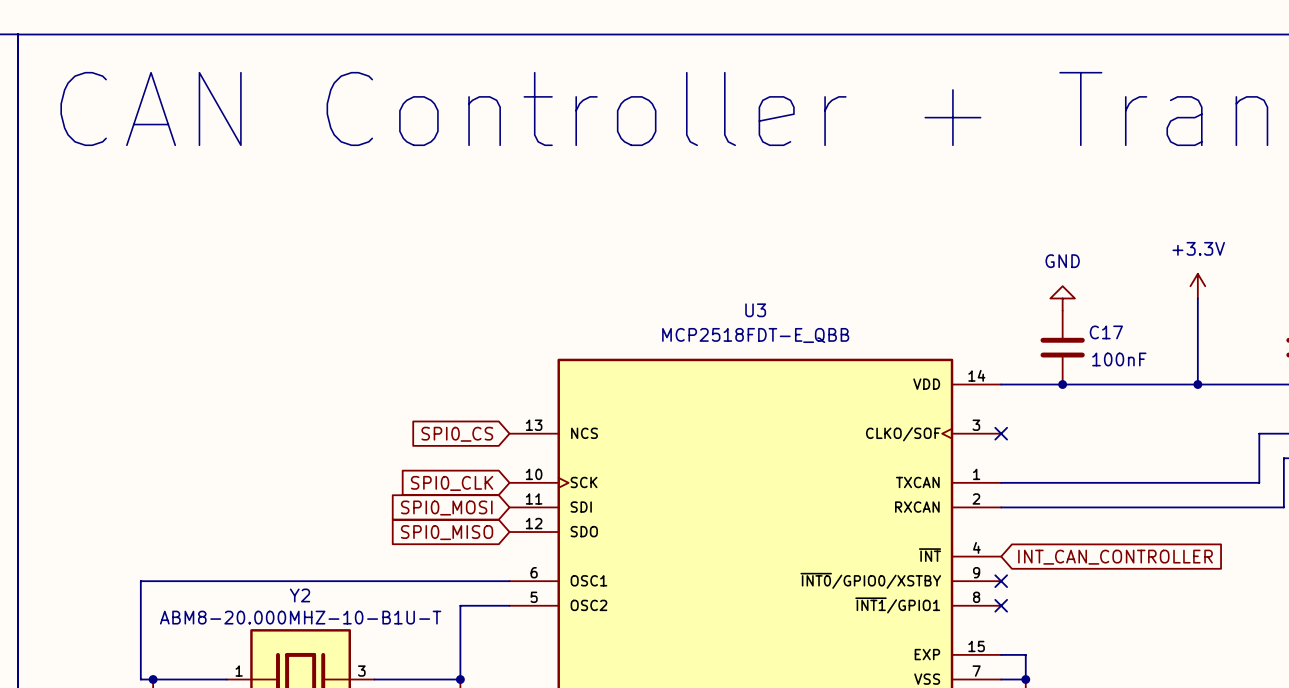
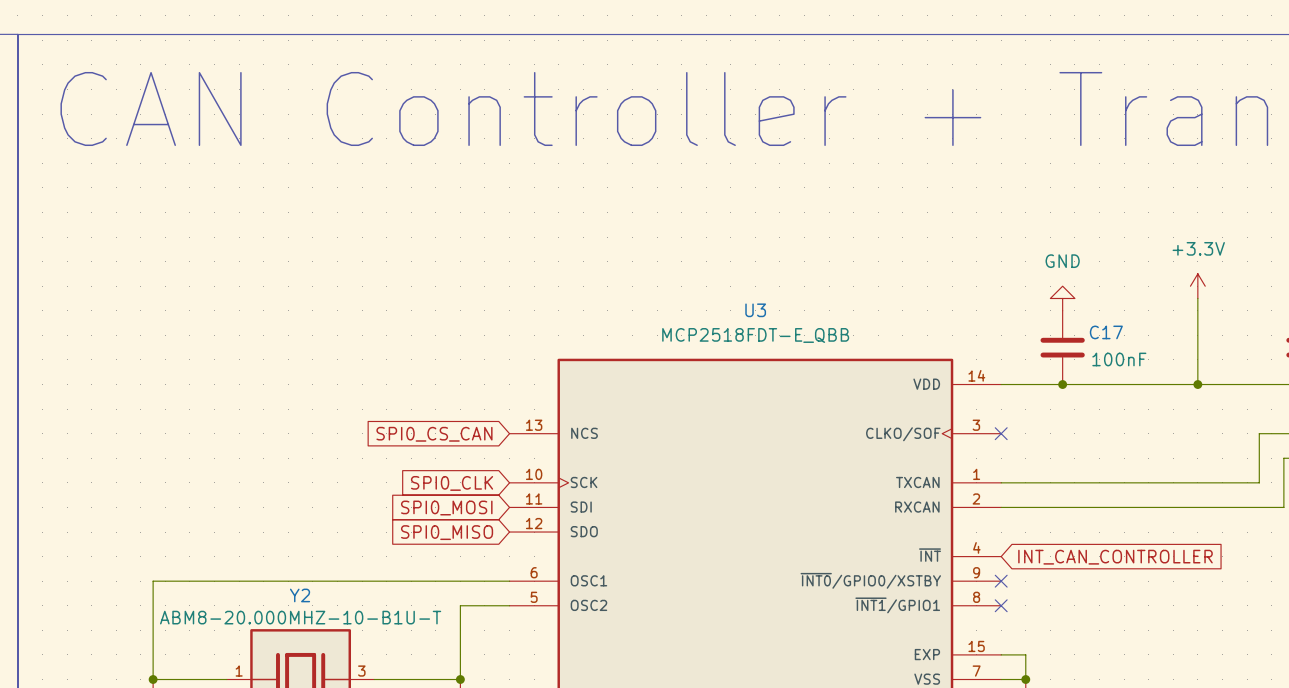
global label: SPI0_CS (457, 434) -> SPI0_CS_CAN (434, 434)
wire: (153, 581) (140, 581) (140, 679) (153, 679) -> (153, 581) (153, 679)

